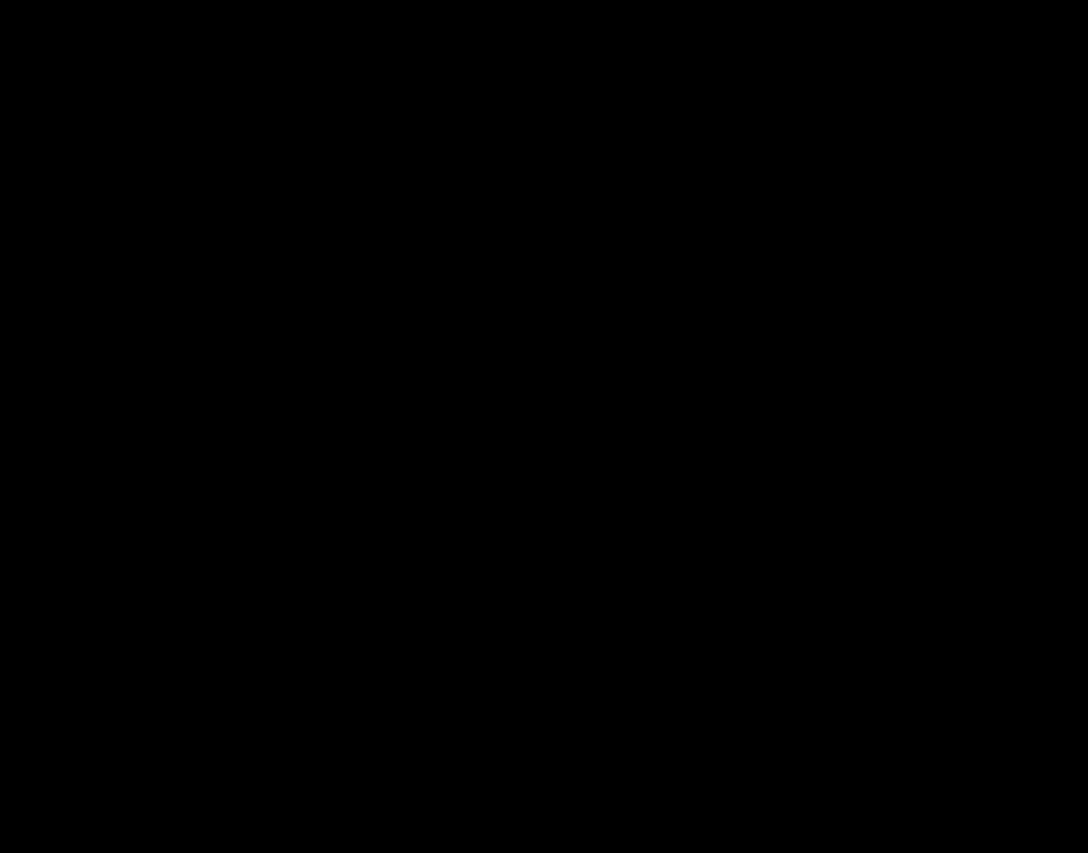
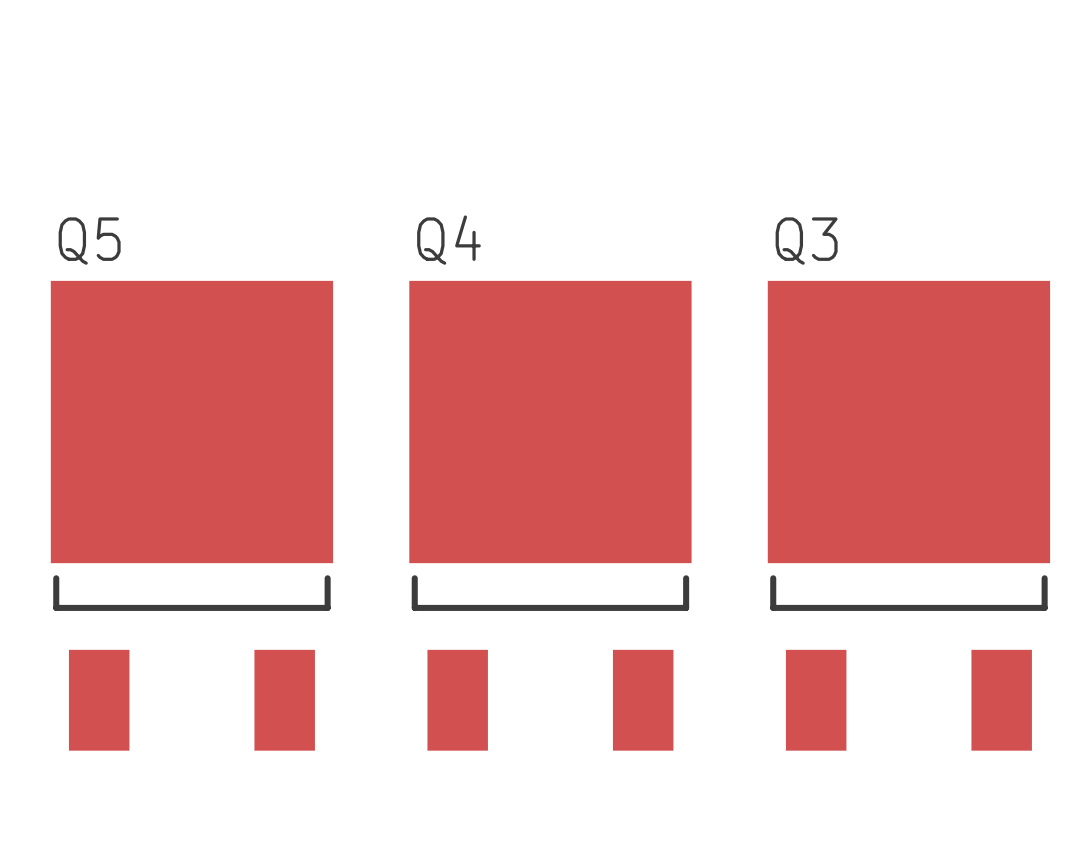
Q5: none -> (191, 515)
Q4: none -> (550, 515)
Q3: none -> (908, 515)

